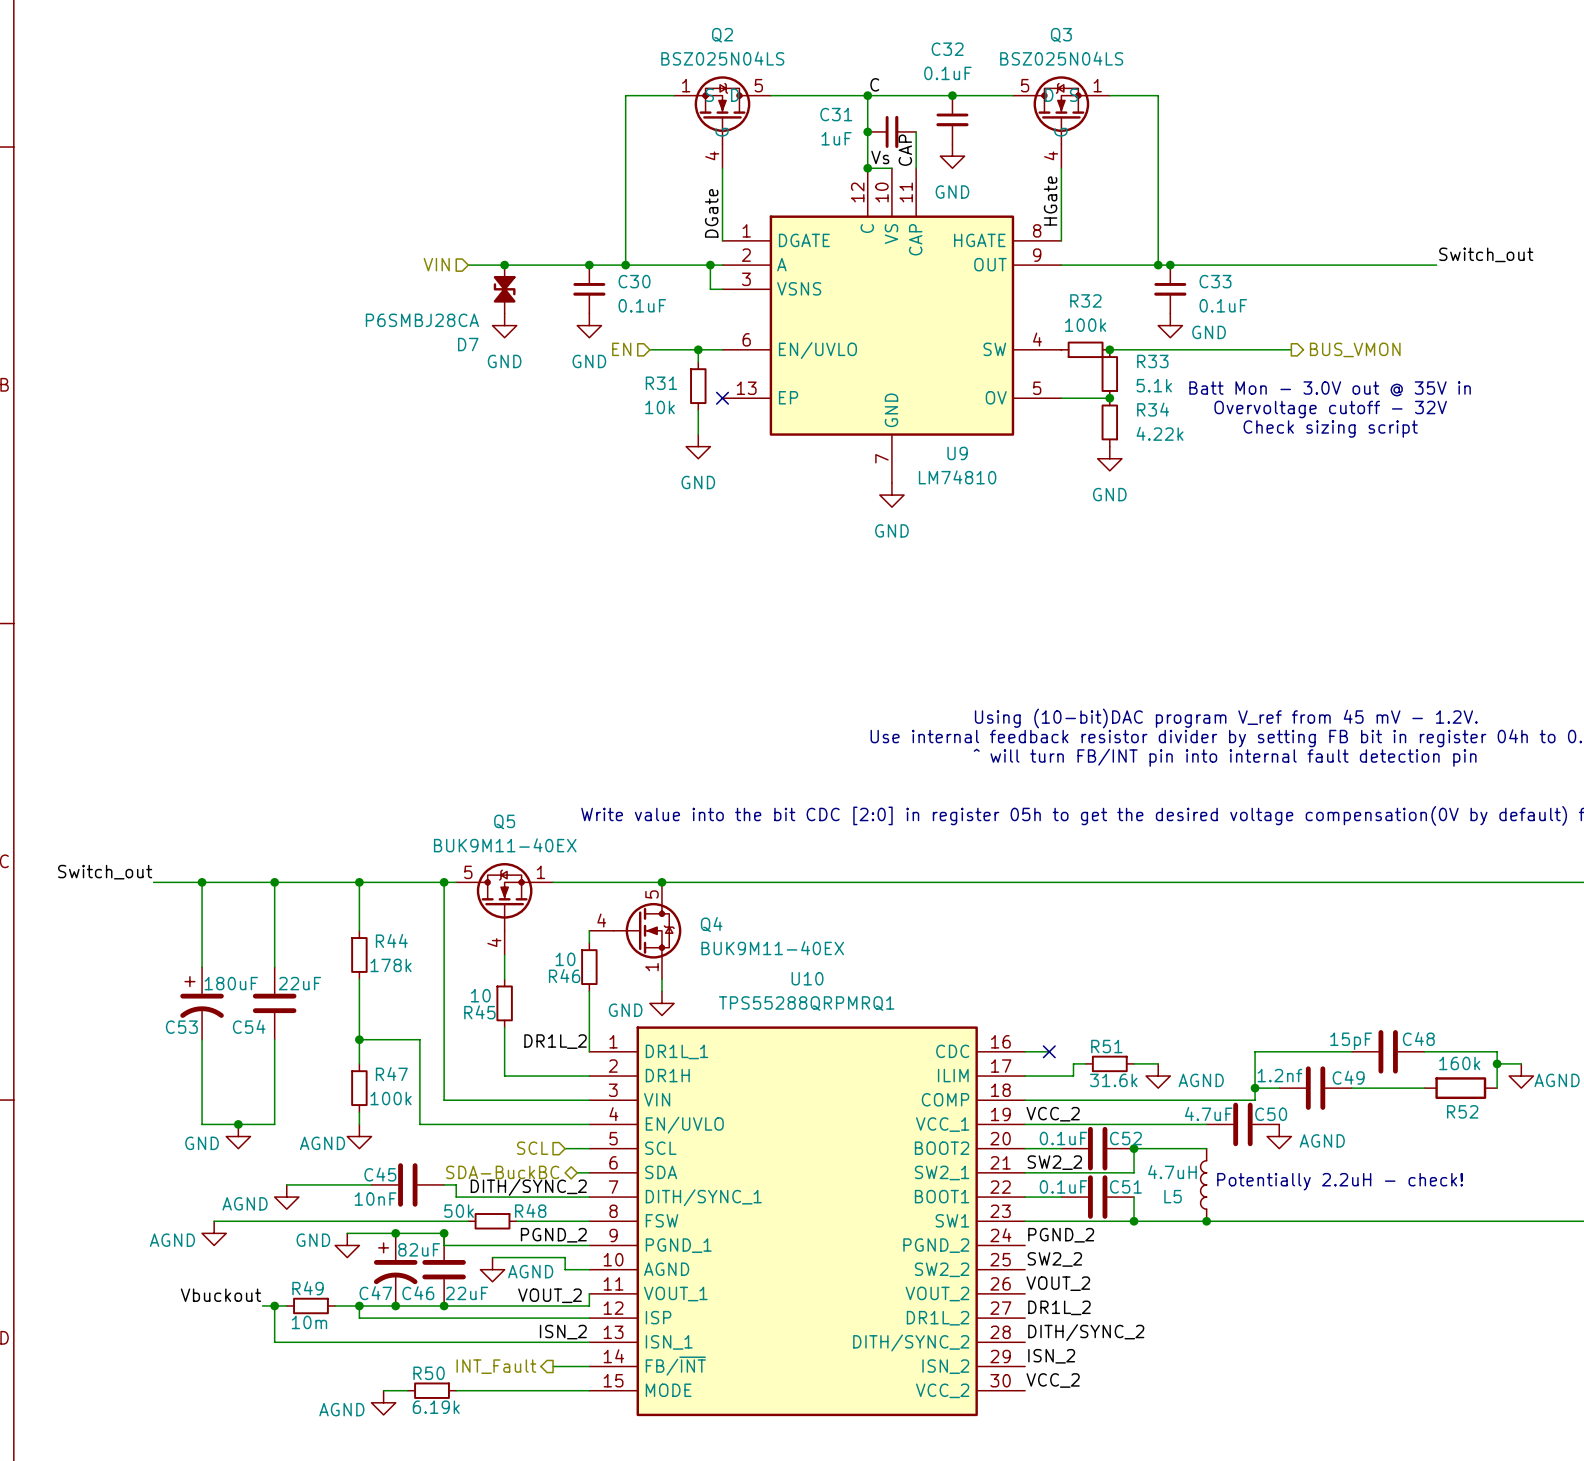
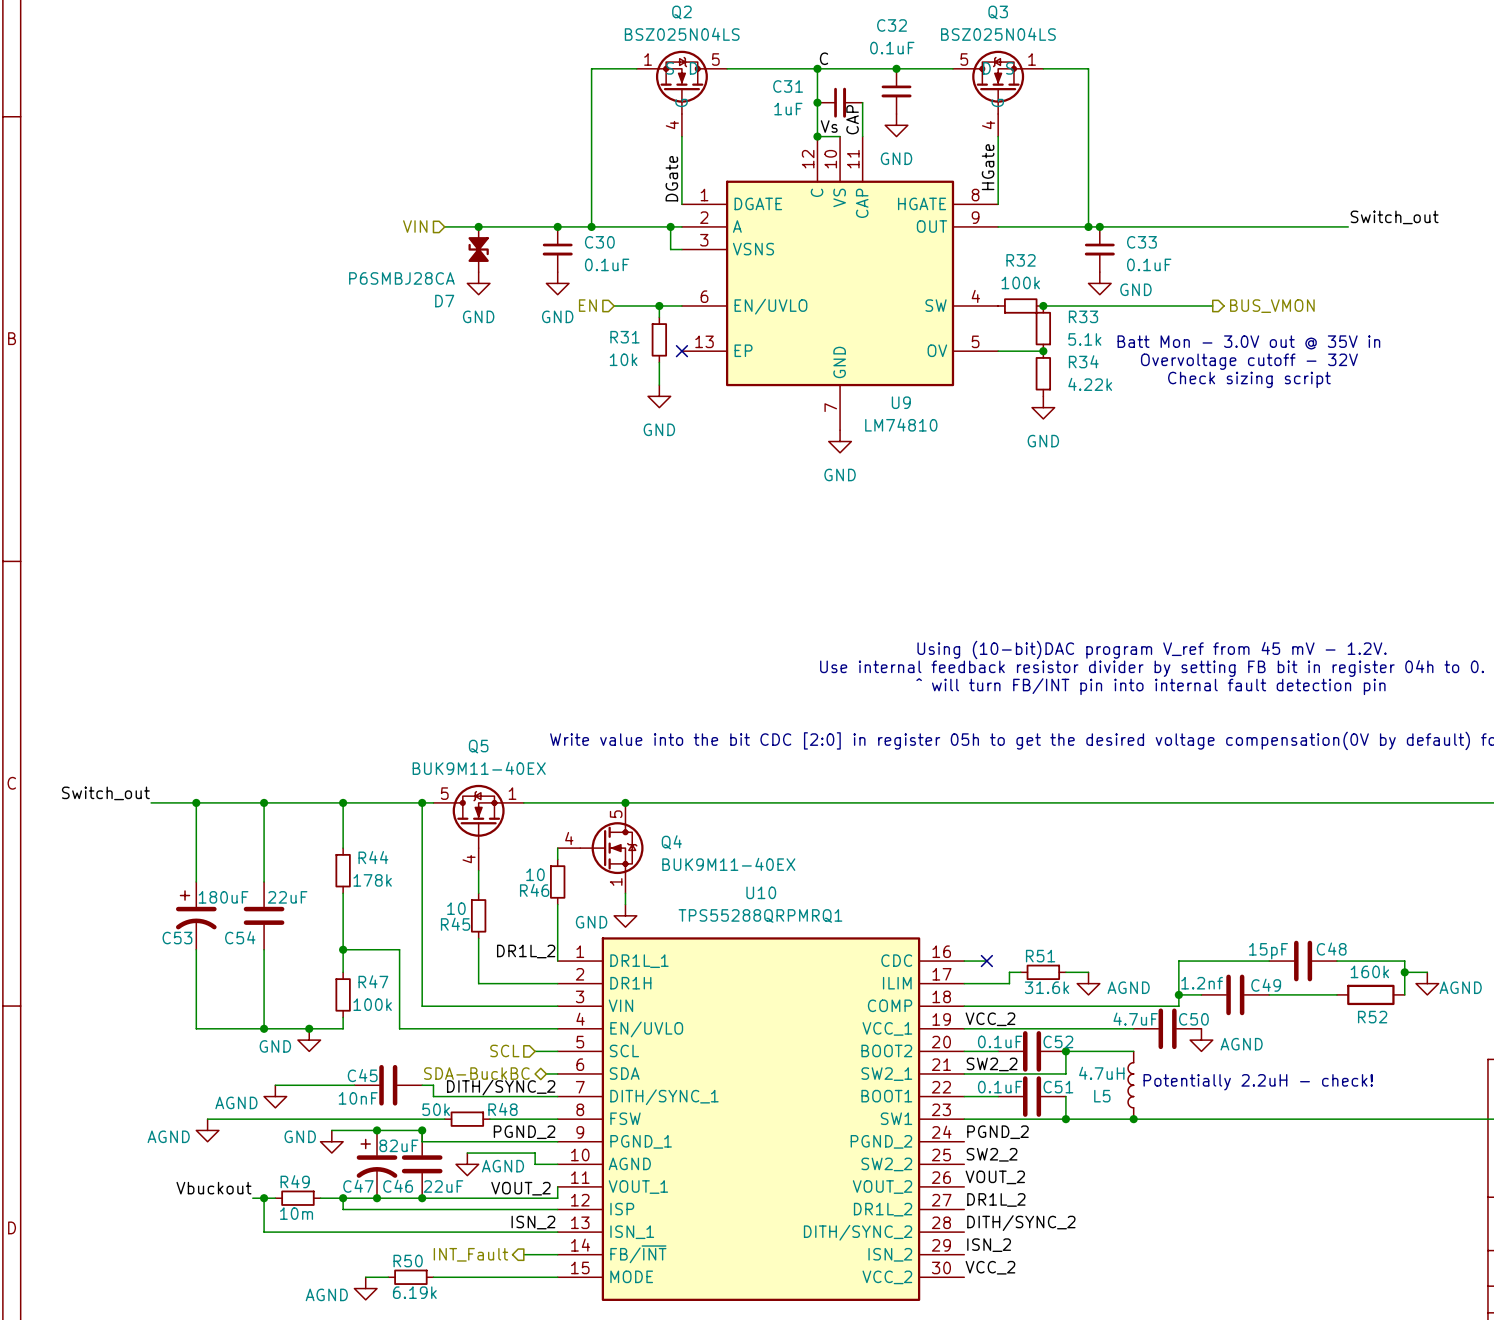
junction position: (238, 1124) -> (264, 1028)
wire: none -> (264, 1028) (343, 1028)
junction: none -> (309, 1028)
power symbol position: GND (238, 1136) -> GND (309, 1040)
power symbol: AGND (359, 1136) -> none

